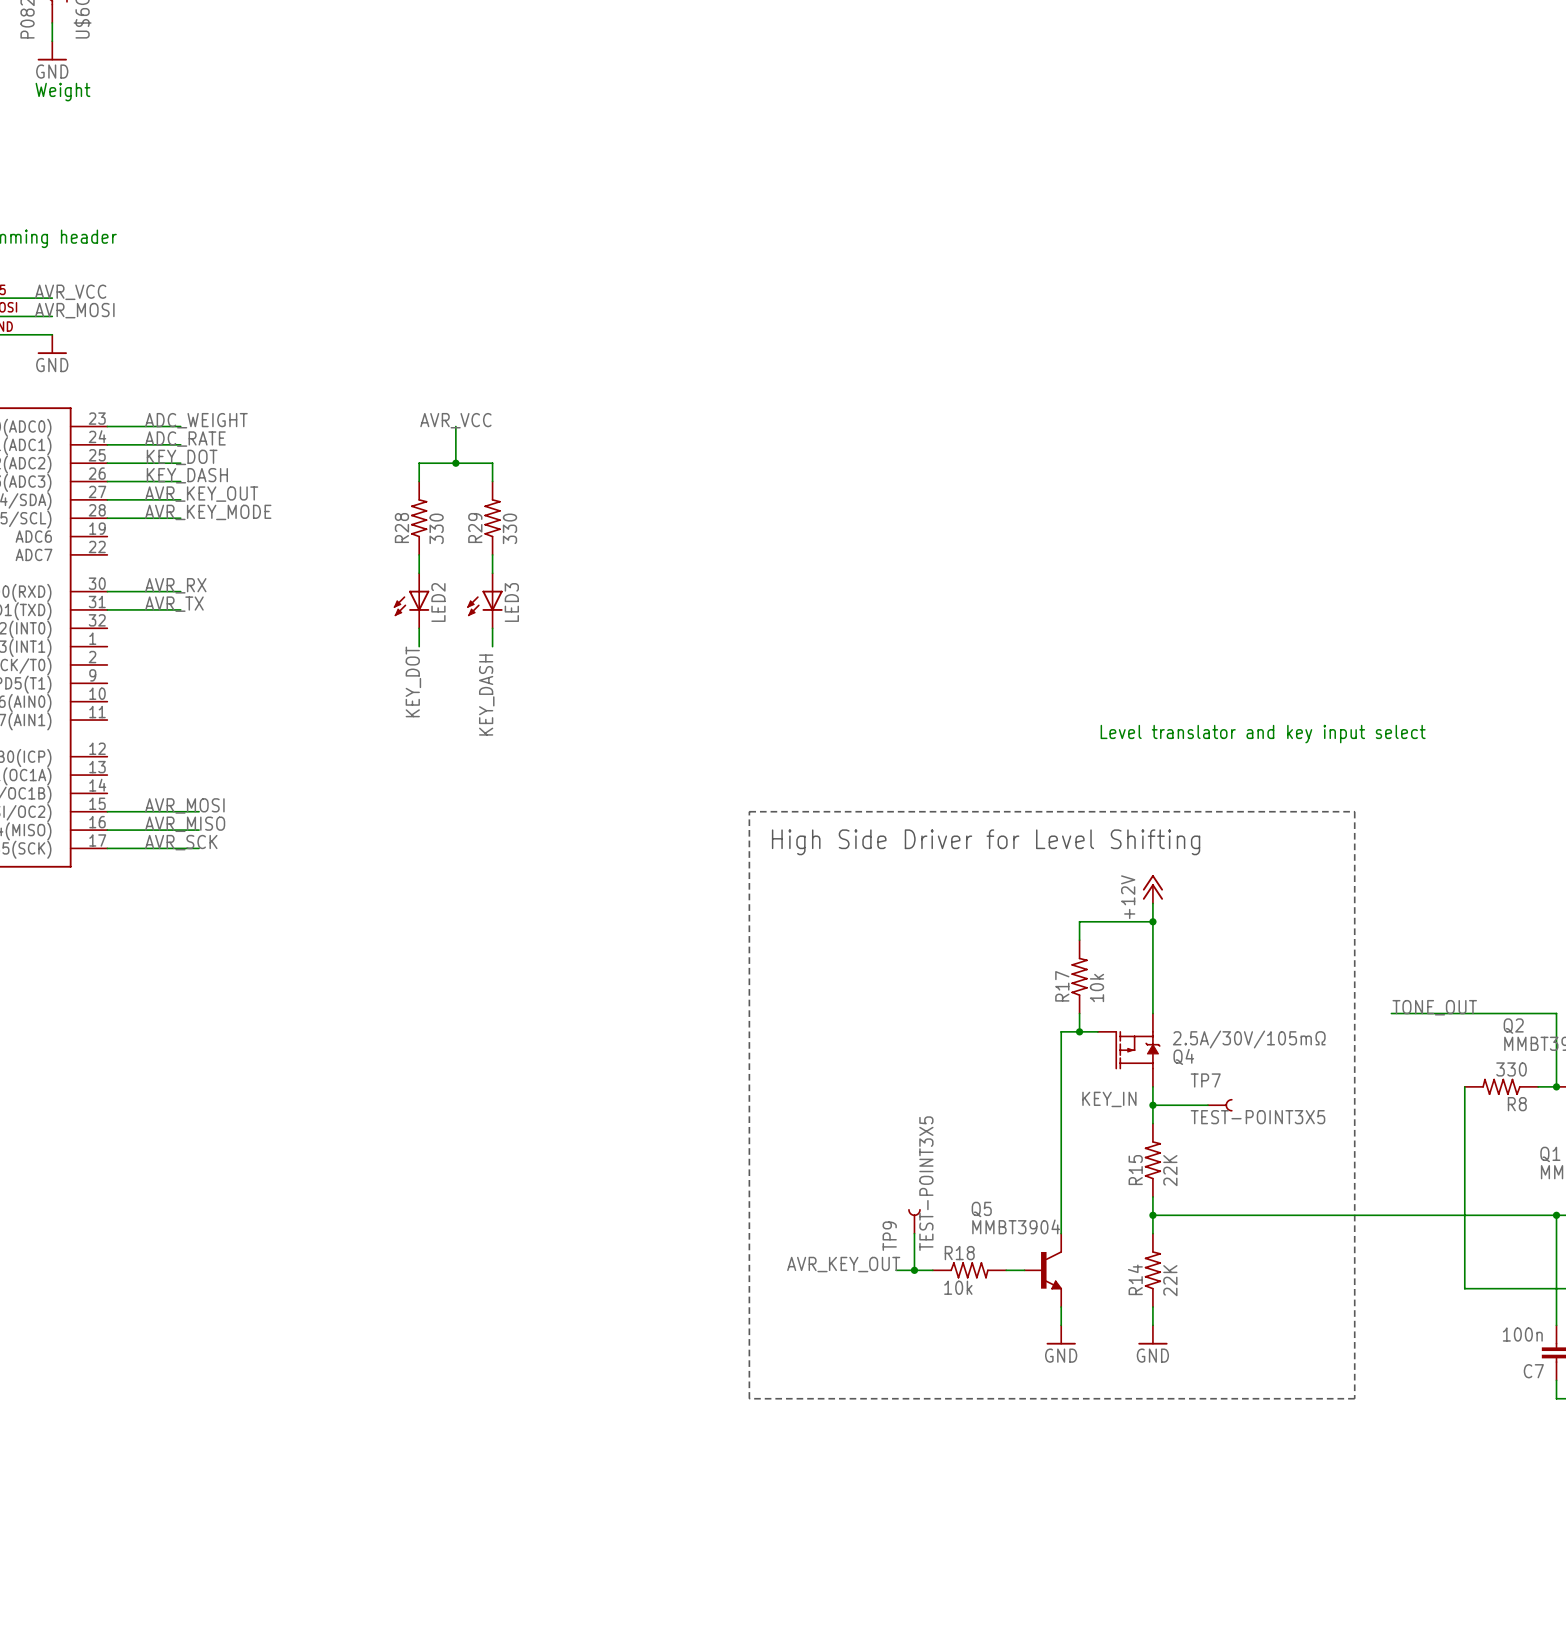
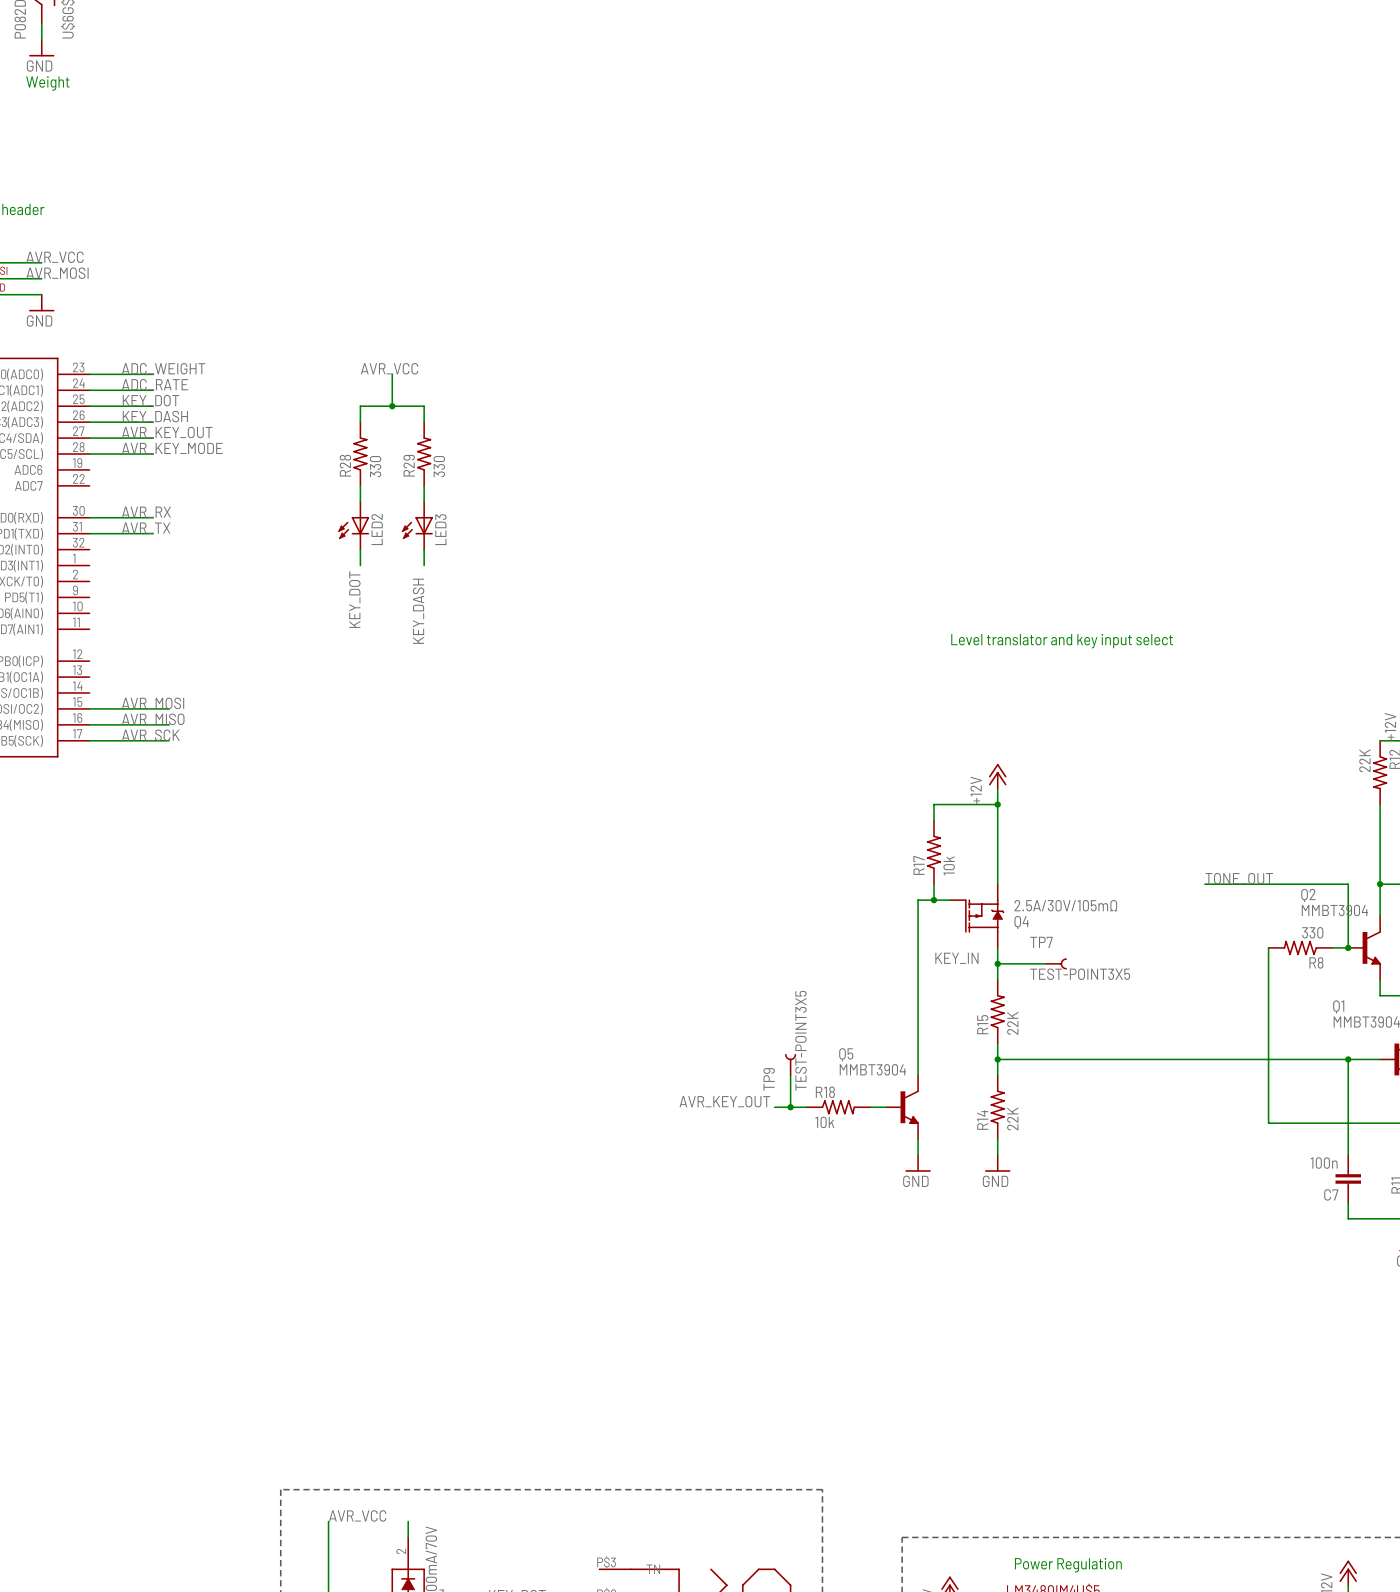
line: (749, 811) (1354, 811) (1354, 1398) (749, 1398) (749, 811) -> none
text: High Side Driver for Level Shifting (986, 842) -> none

